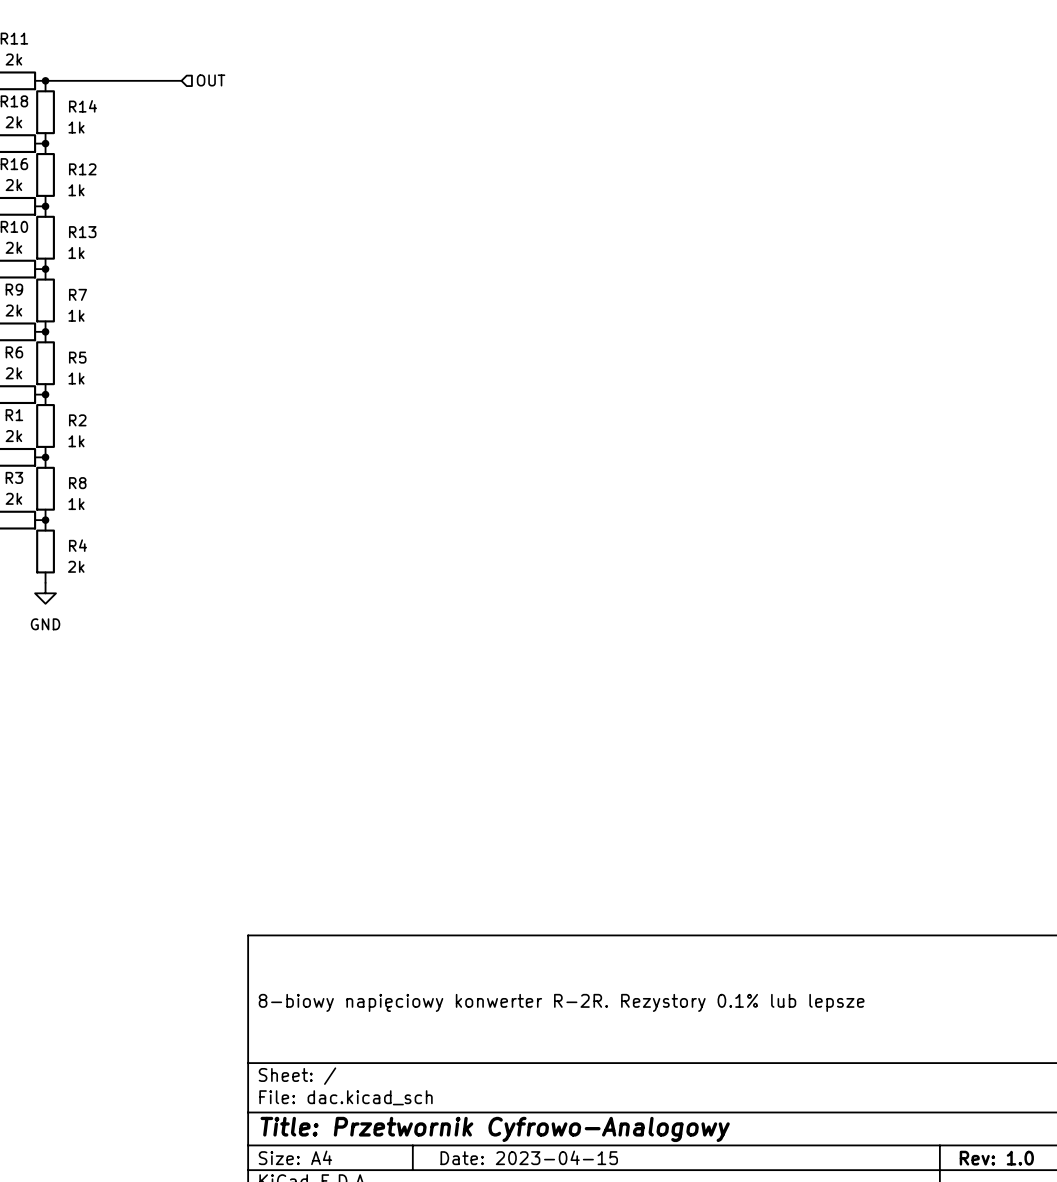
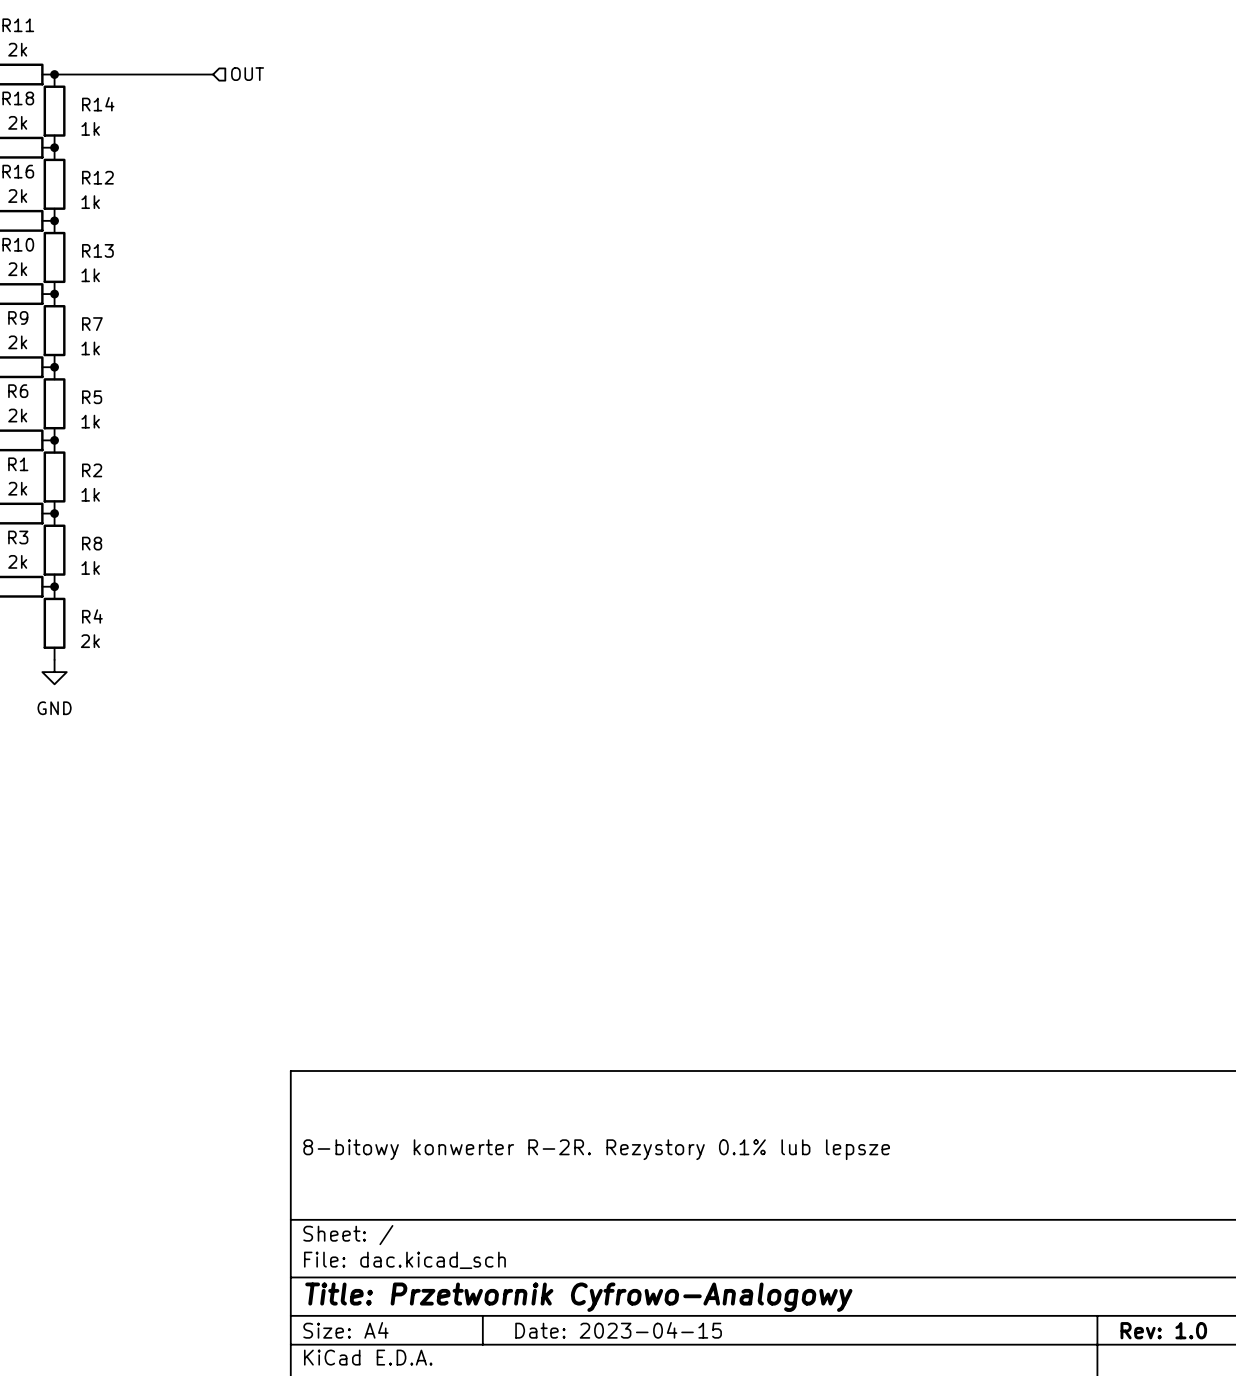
title block: 8-biowy napięciowy konwerter R-2R. Rezystory 0.1% lub lepsze (561, 1002) -> 8-bitowy konwerter R-2R. Rezystory 0.1% lub lepsze (596, 1149)

